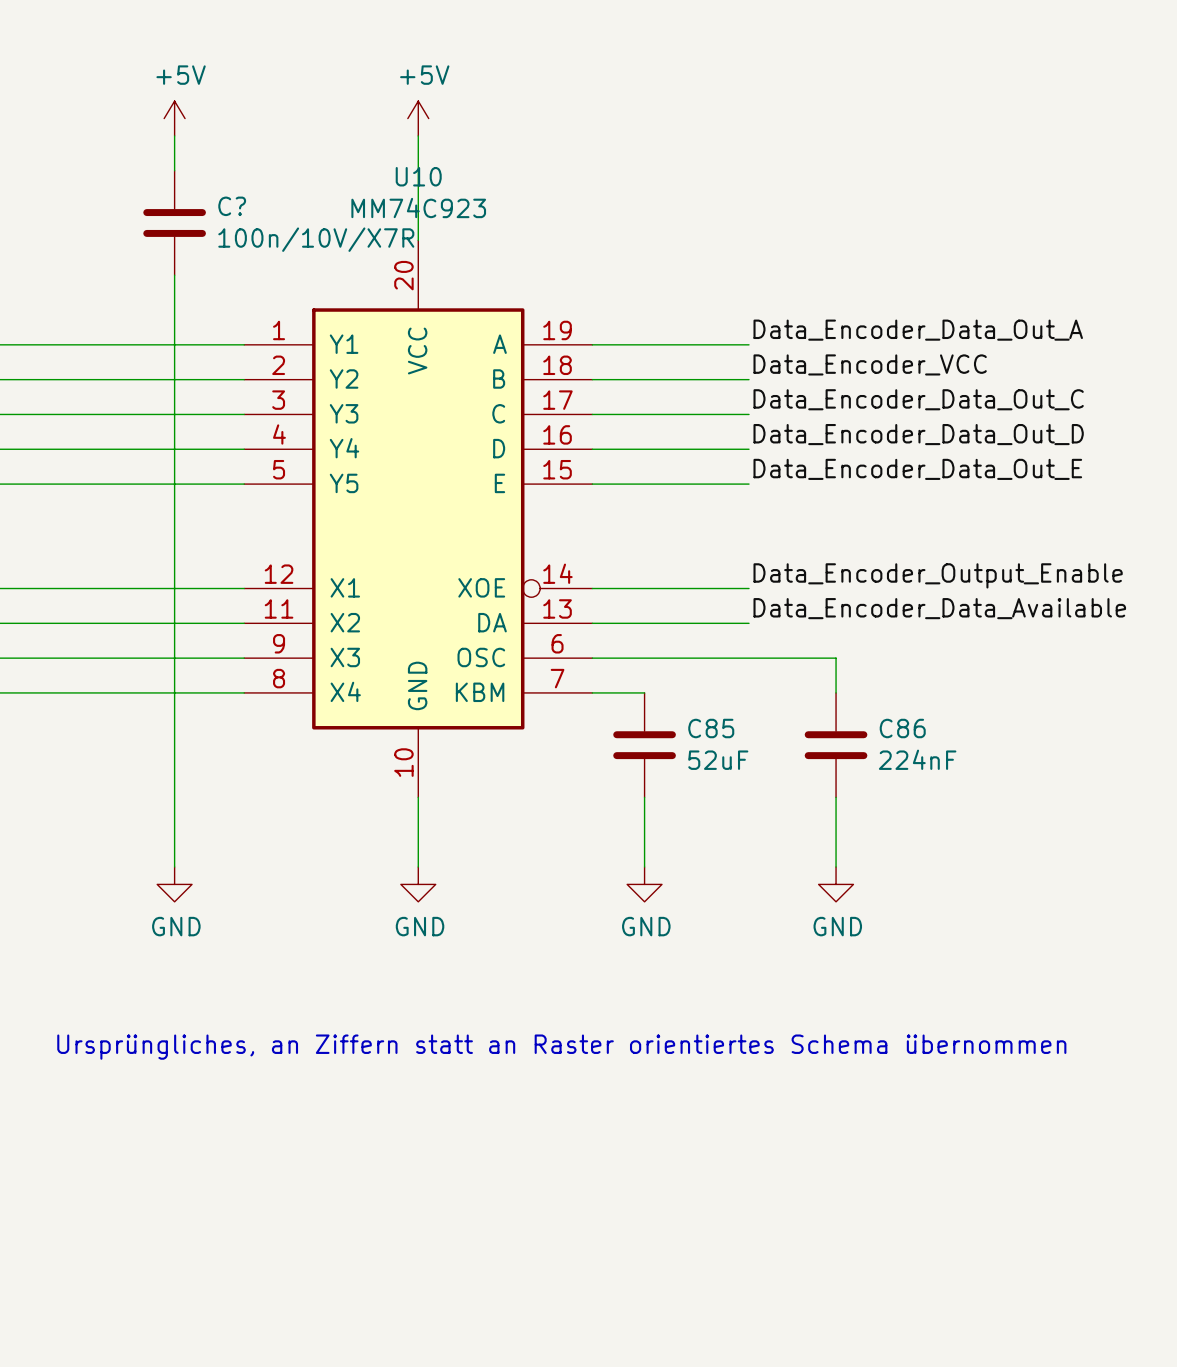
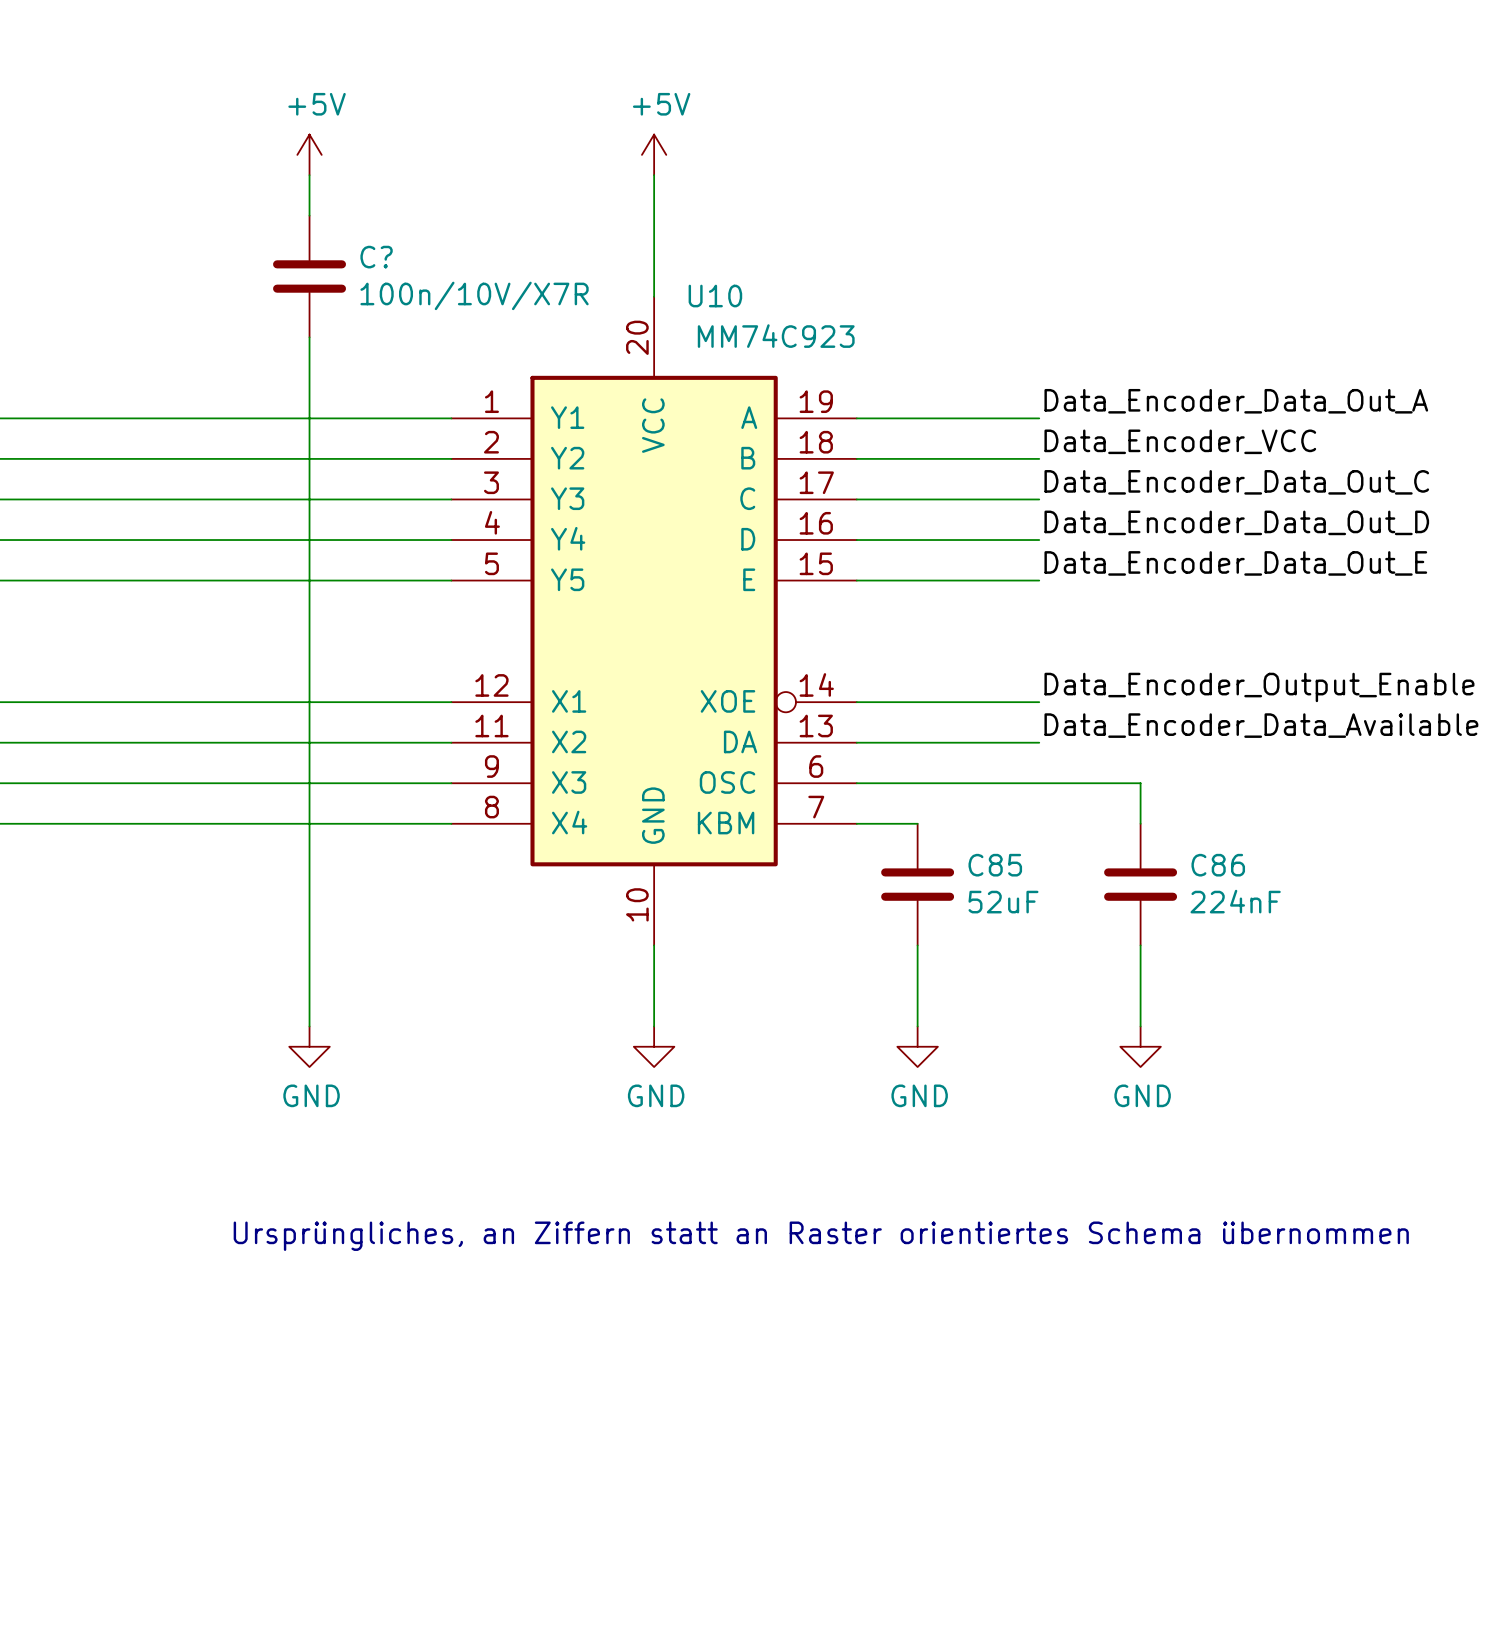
power symbol position: +5V (174, 118) -> +5V (309, 154)
wire: (174, 135) (174, 170) -> (309, 175) (309, 215)
U10 name position: U10 (418, 176) -> U10 (715, 296)
U10 value position: MM74C923 (418, 208) -> MM74C923 (776, 336)
C? position: (174, 222) -> (309, 276)
wire: (174, 275) (174, 867) -> (309, 337) (309, 1026)
power symbol position: GND (174, 884) -> GND (309, 1046)

